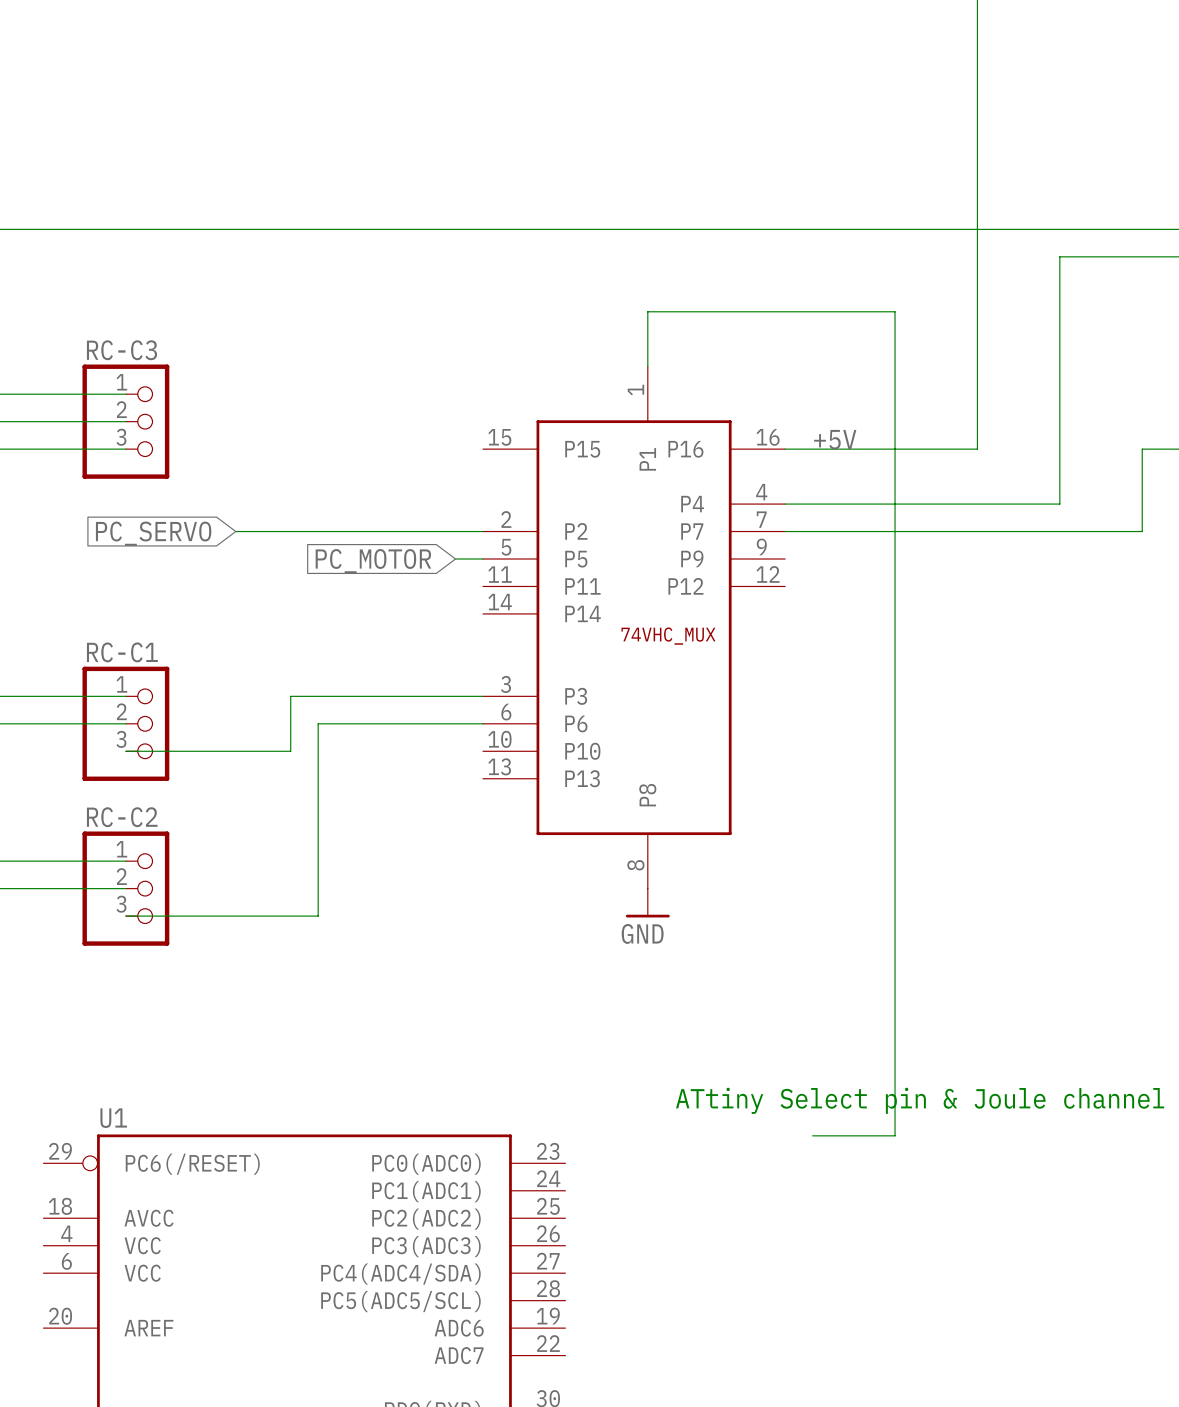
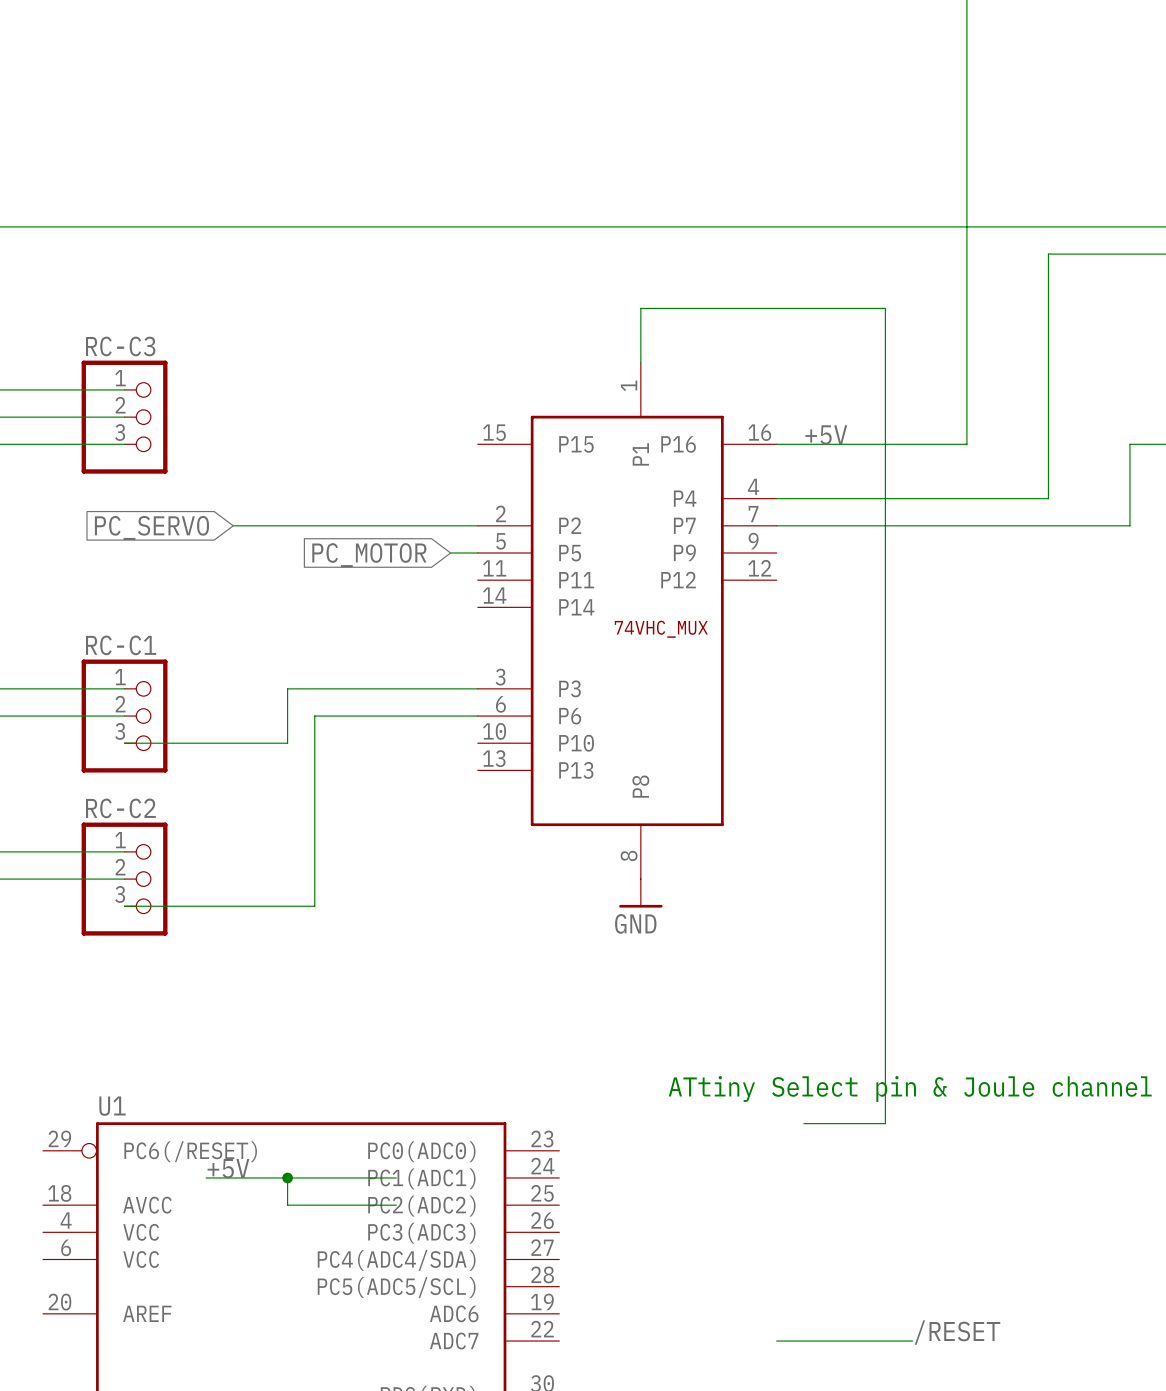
label: none -> +5V (228, 1168)
wire: none -> (206, 1177) (396, 1177)
wire: none -> (287, 1177) (287, 1205) (396, 1205)
junction: none -> (287, 1177)
label: none -> /RESET (957, 1332)
wire: none -> (776, 1341) (912, 1341)

